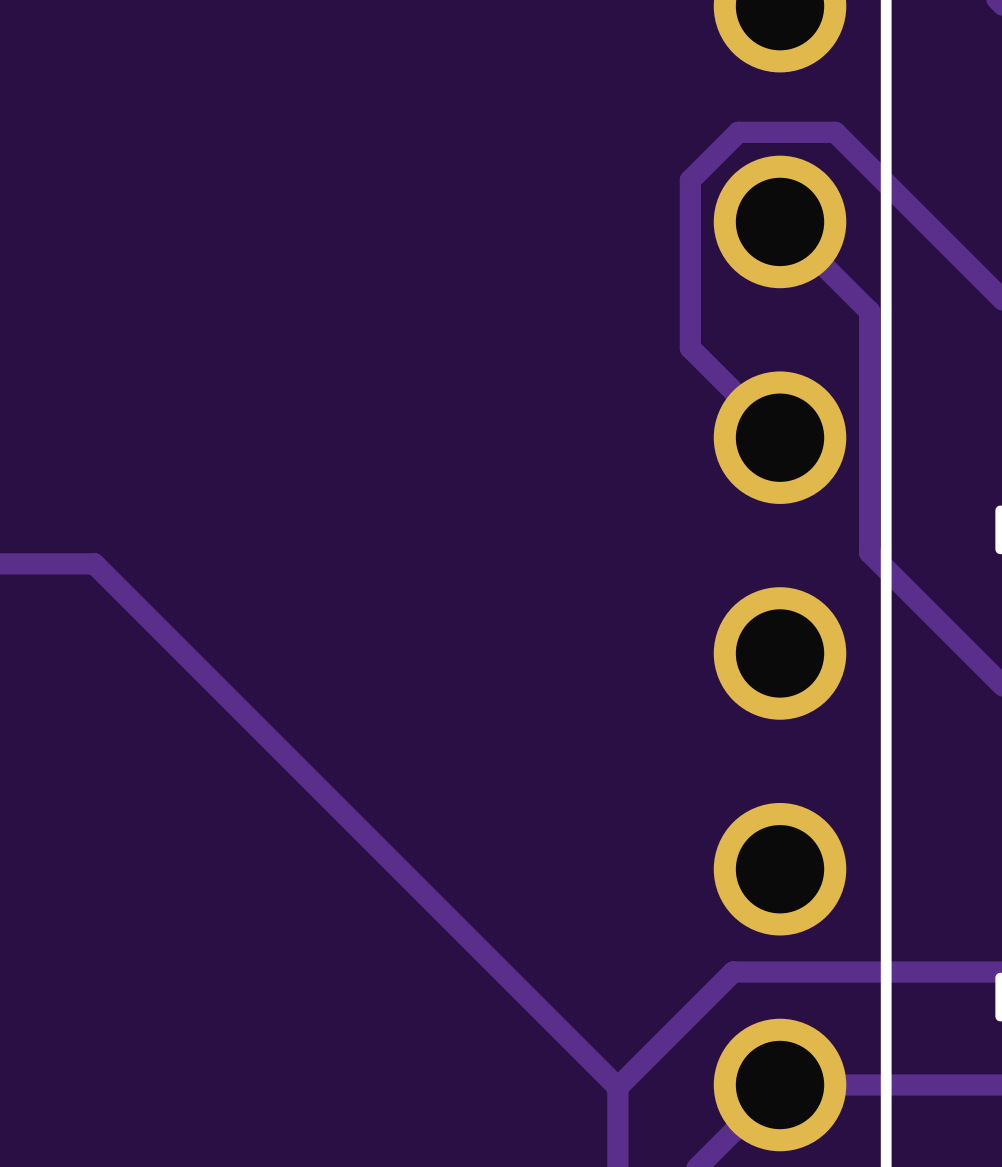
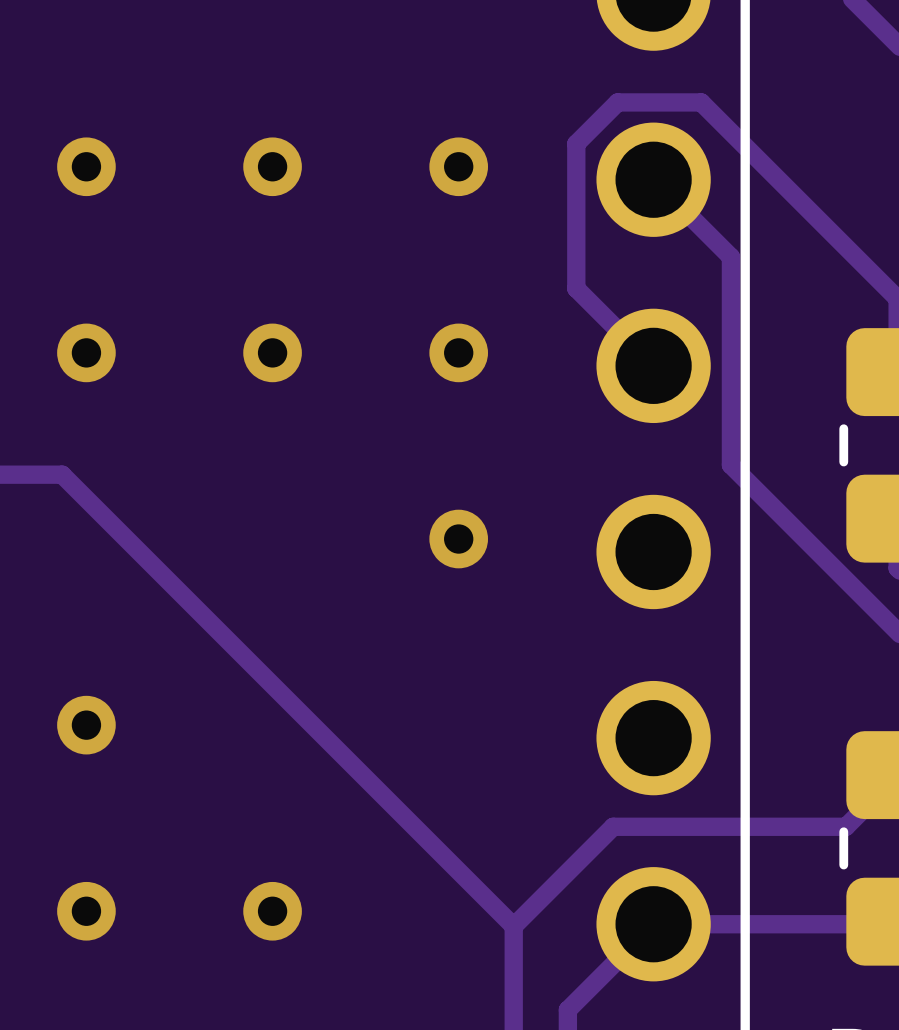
via: none -> (86, 166)
via: none -> (272, 166)
via: none -> (458, 166)
via: none -> (86, 352)
via: none -> (272, 352)
via: none -> (458, 352)
via: none -> (458, 539)
via: none -> (86, 725)
via: none -> (86, 911)
via: none -> (272, 911)

